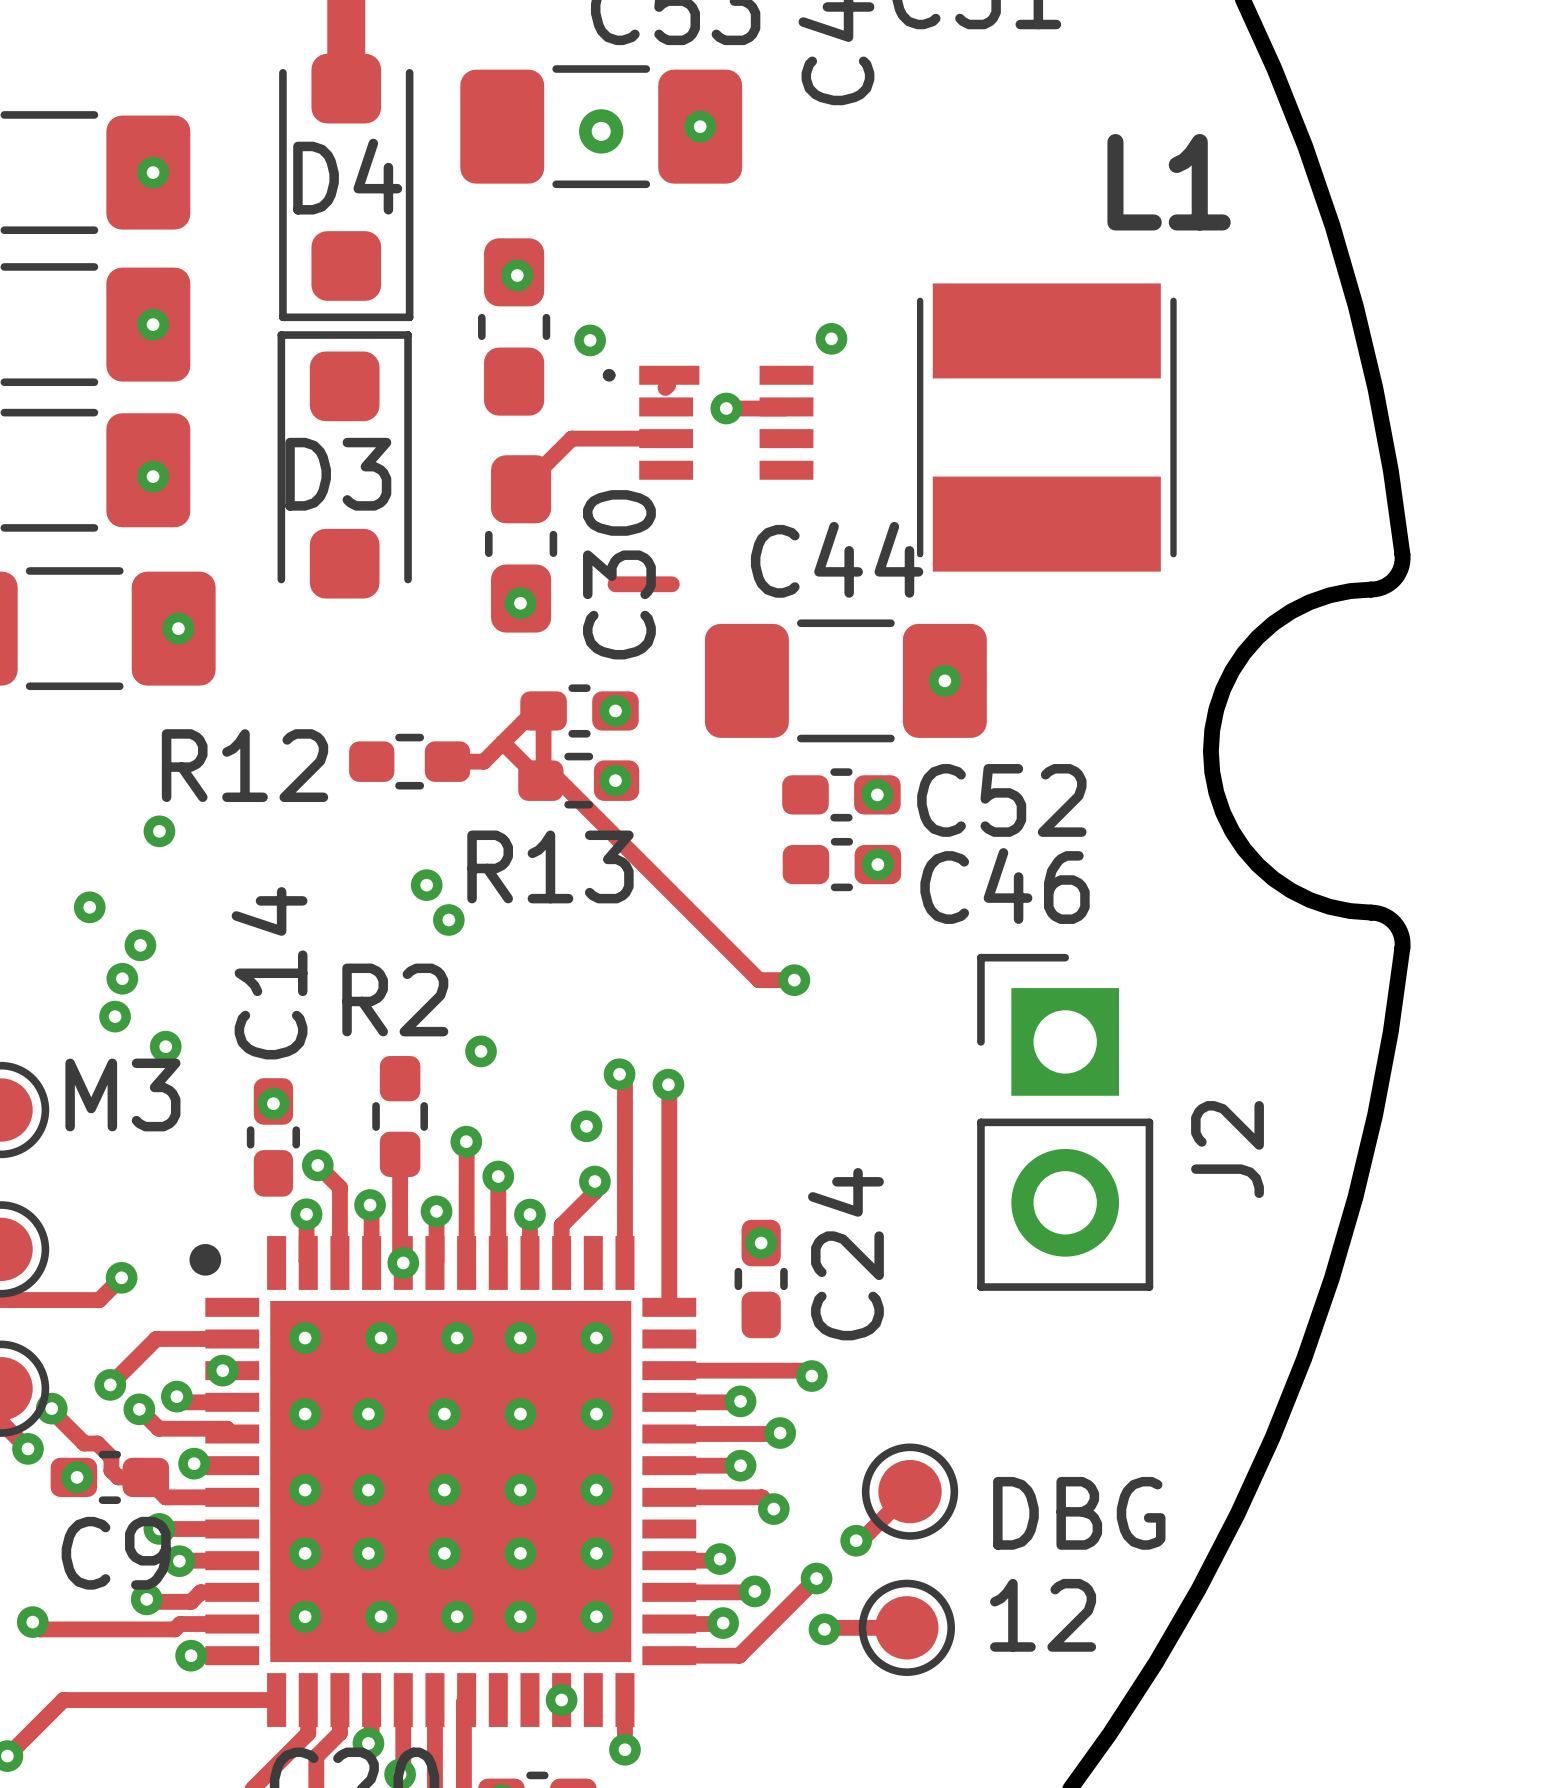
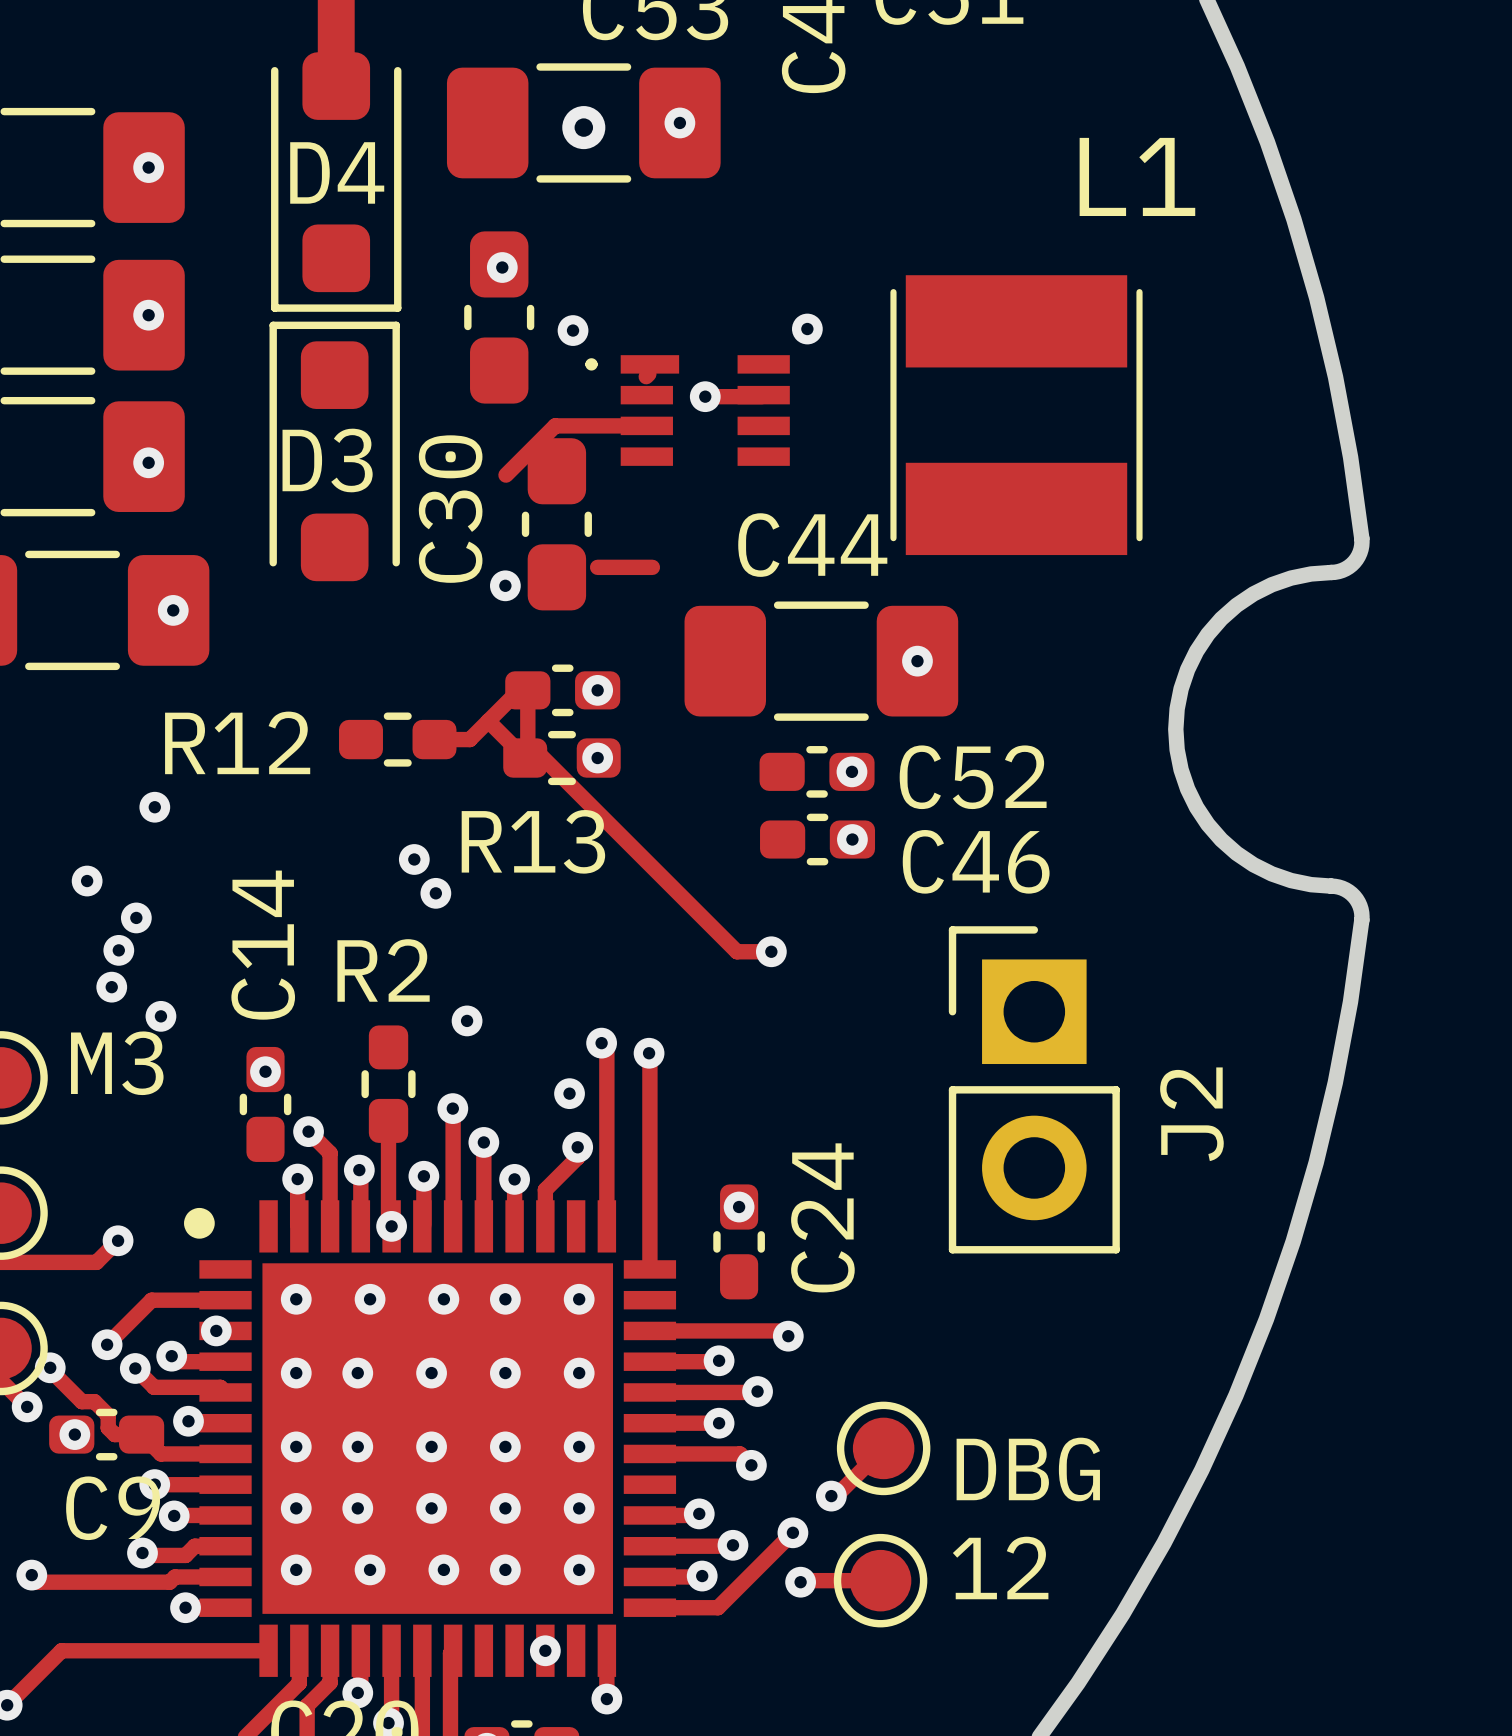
C30 position: (521, 543) -> (556, 524)
C30 name position: C30 (619, 574) -> C30 (450, 509)

